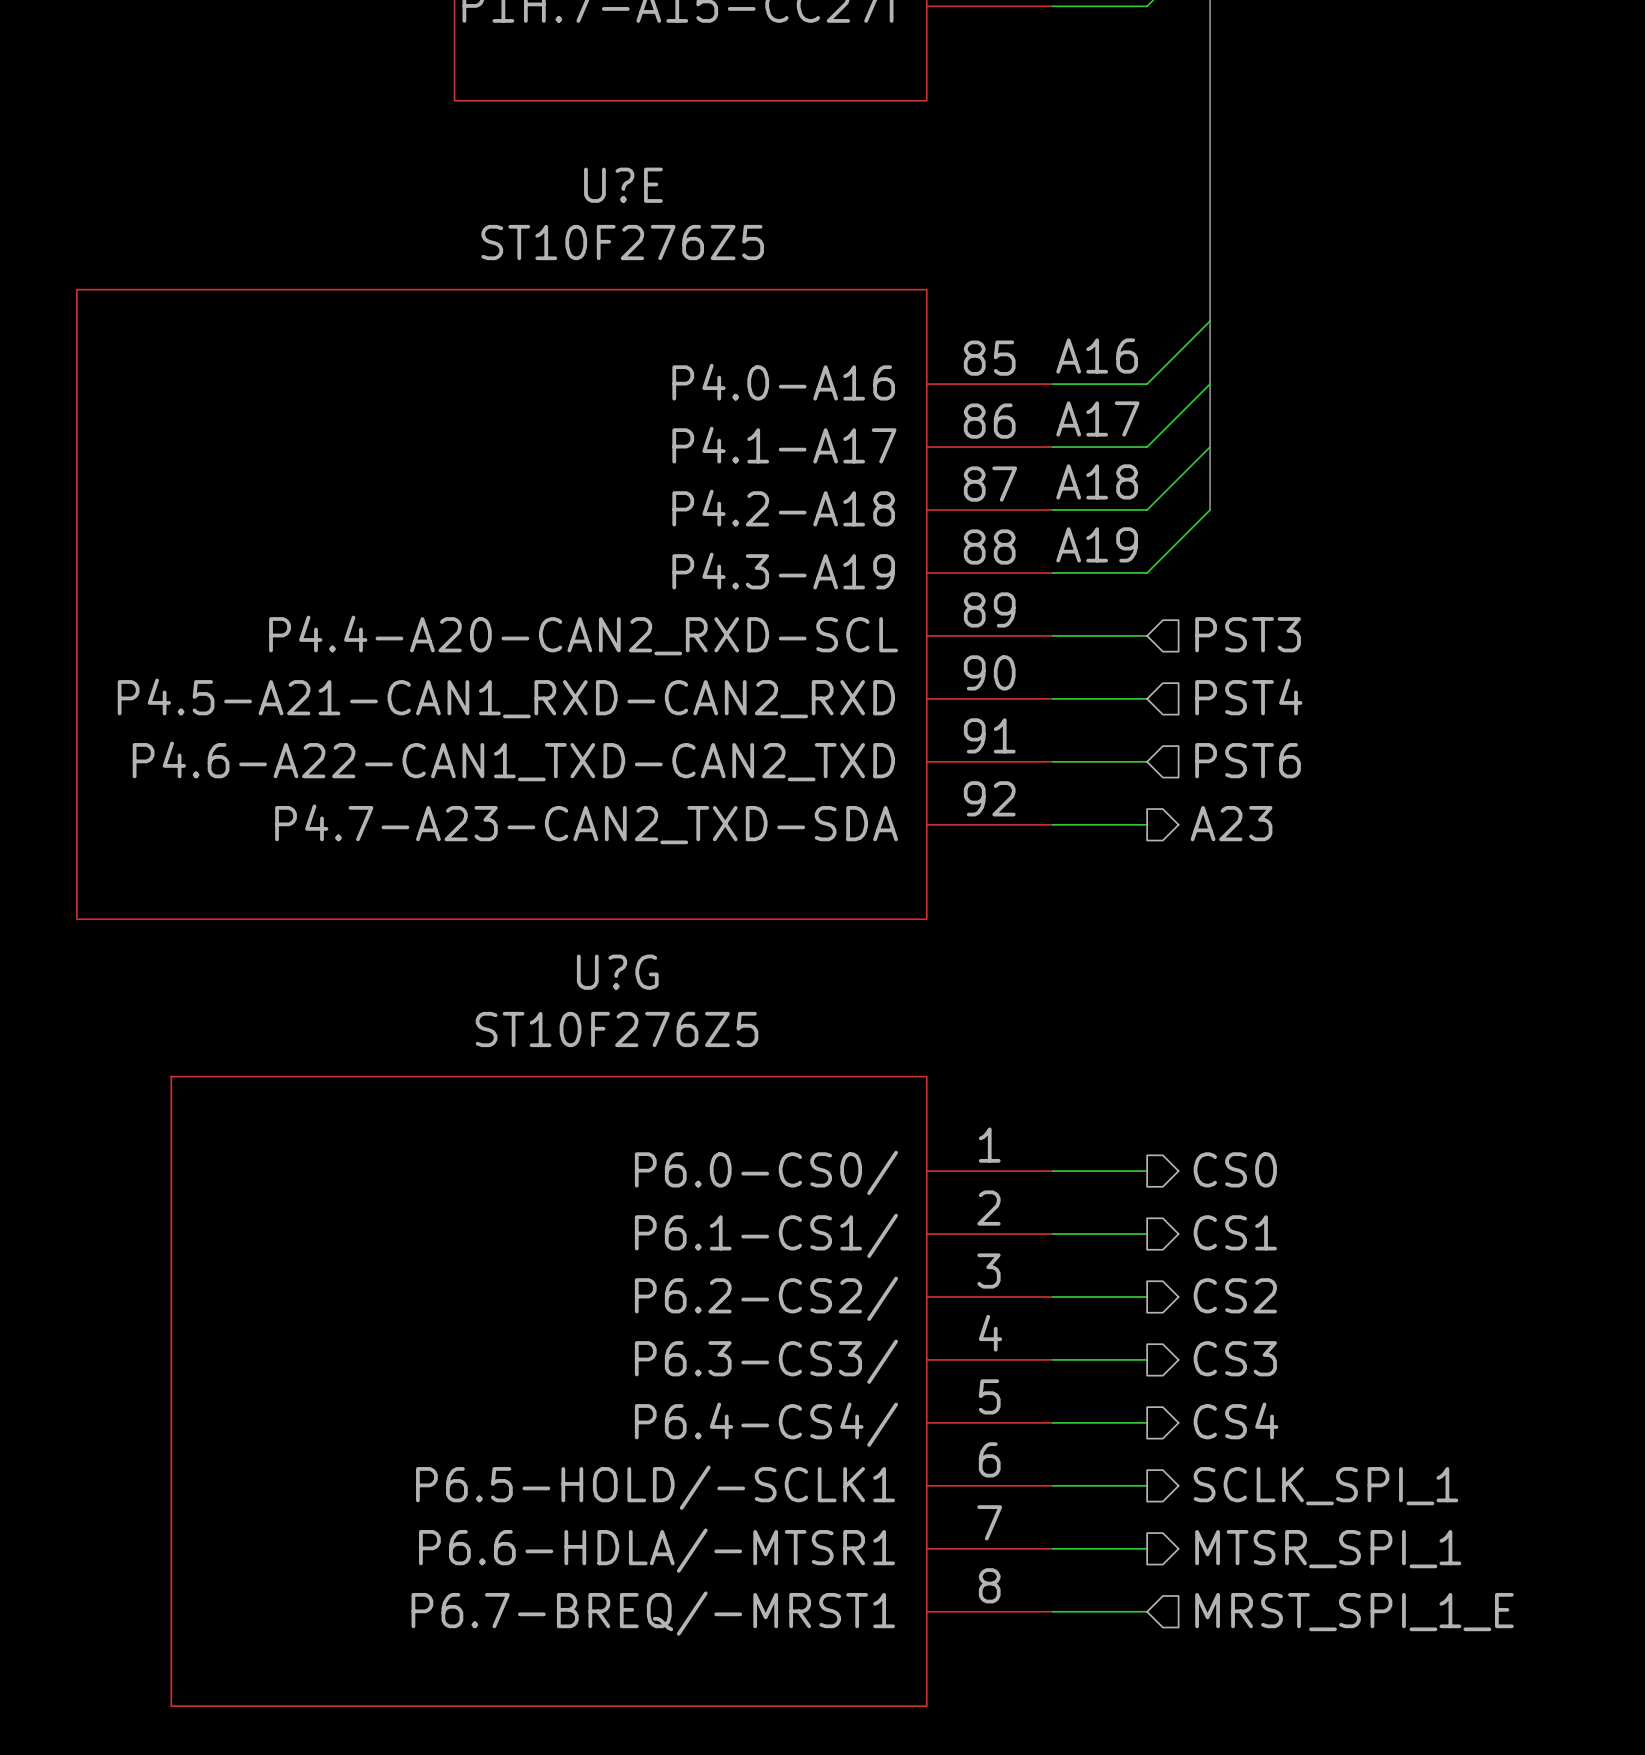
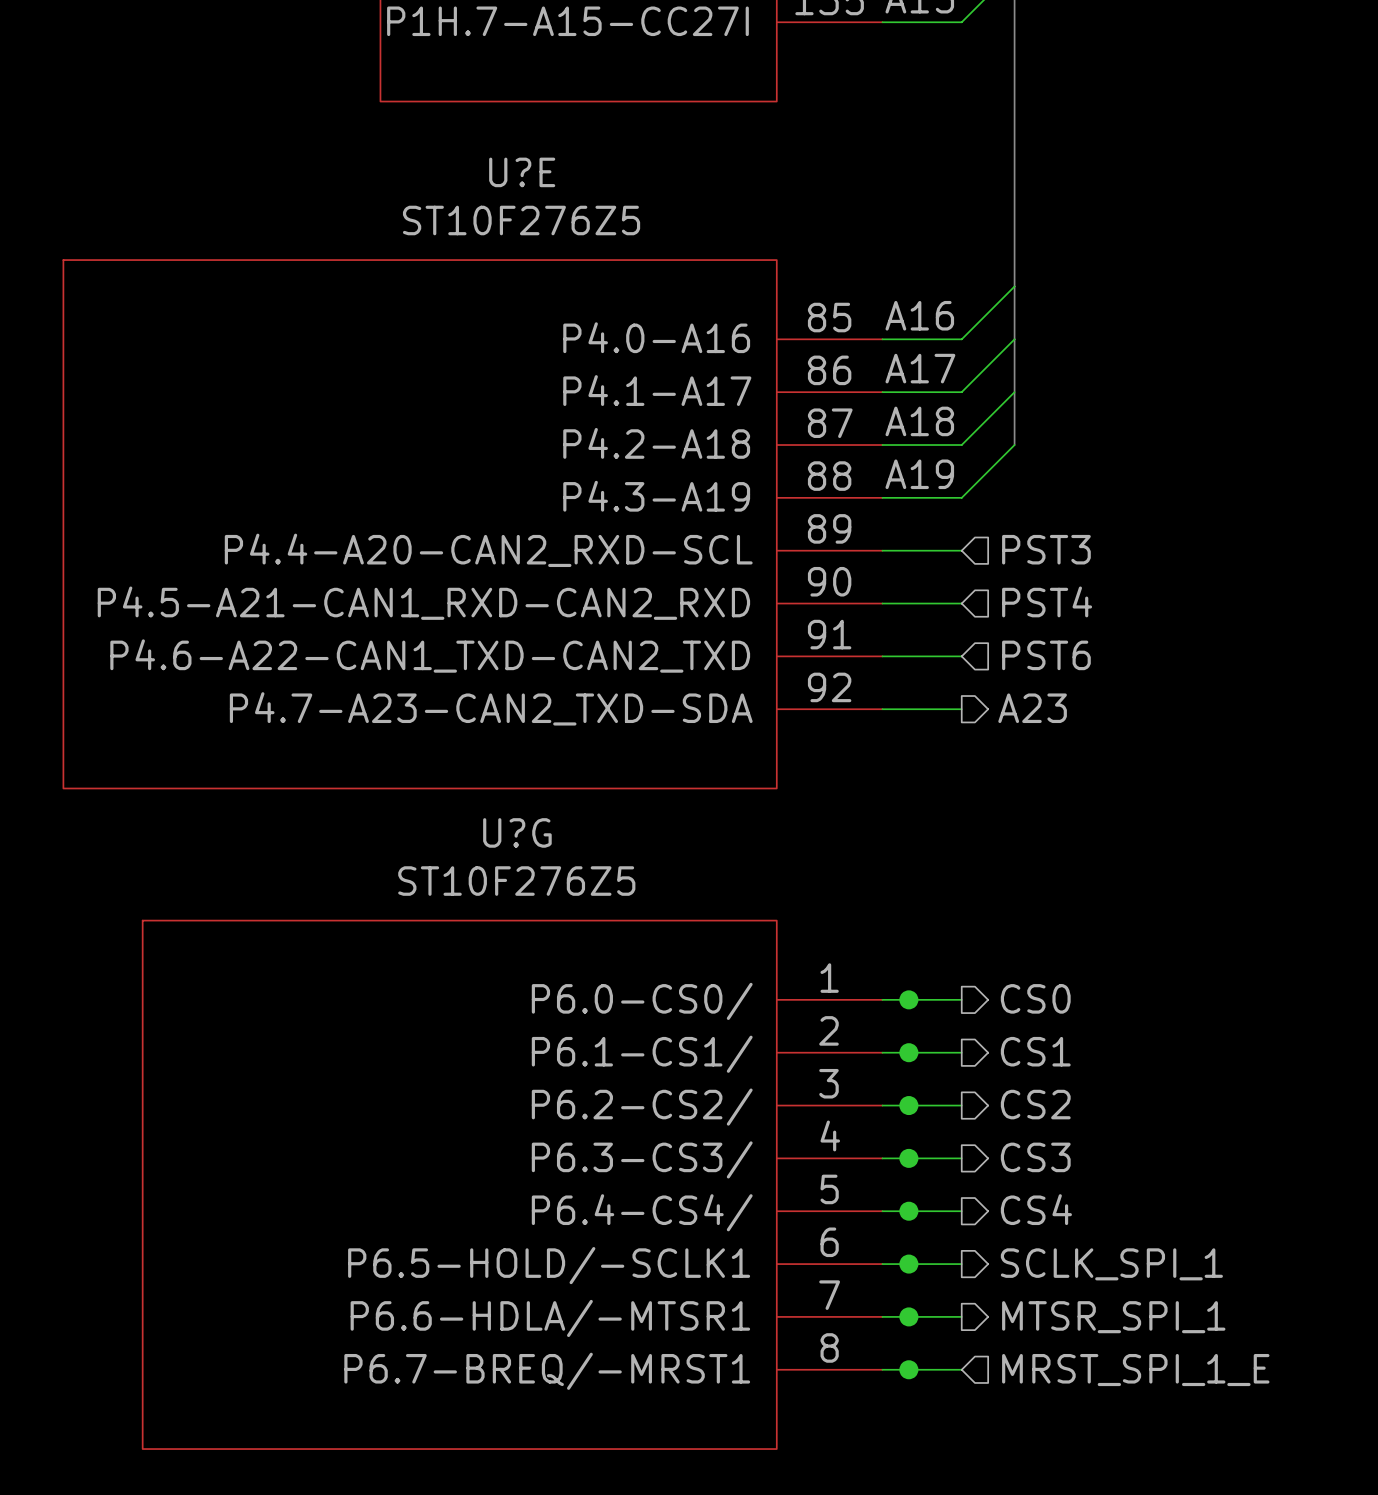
junction: none -> (908, 999)
junction: none -> (908, 1052)
junction: none -> (908, 1105)
junction: none -> (908, 1158)
junction: none -> (908, 1211)
junction: none -> (908, 1264)
junction: none -> (908, 1316)
junction: none -> (908, 1369)

